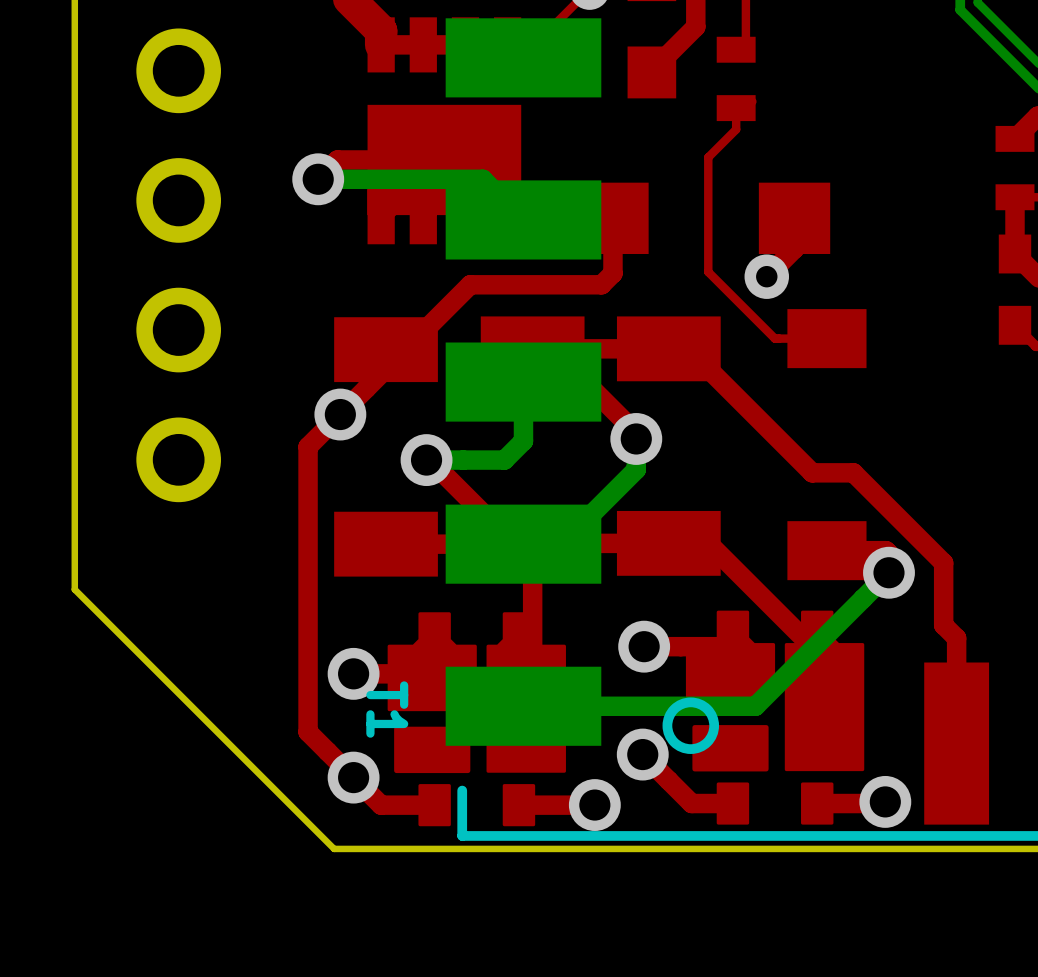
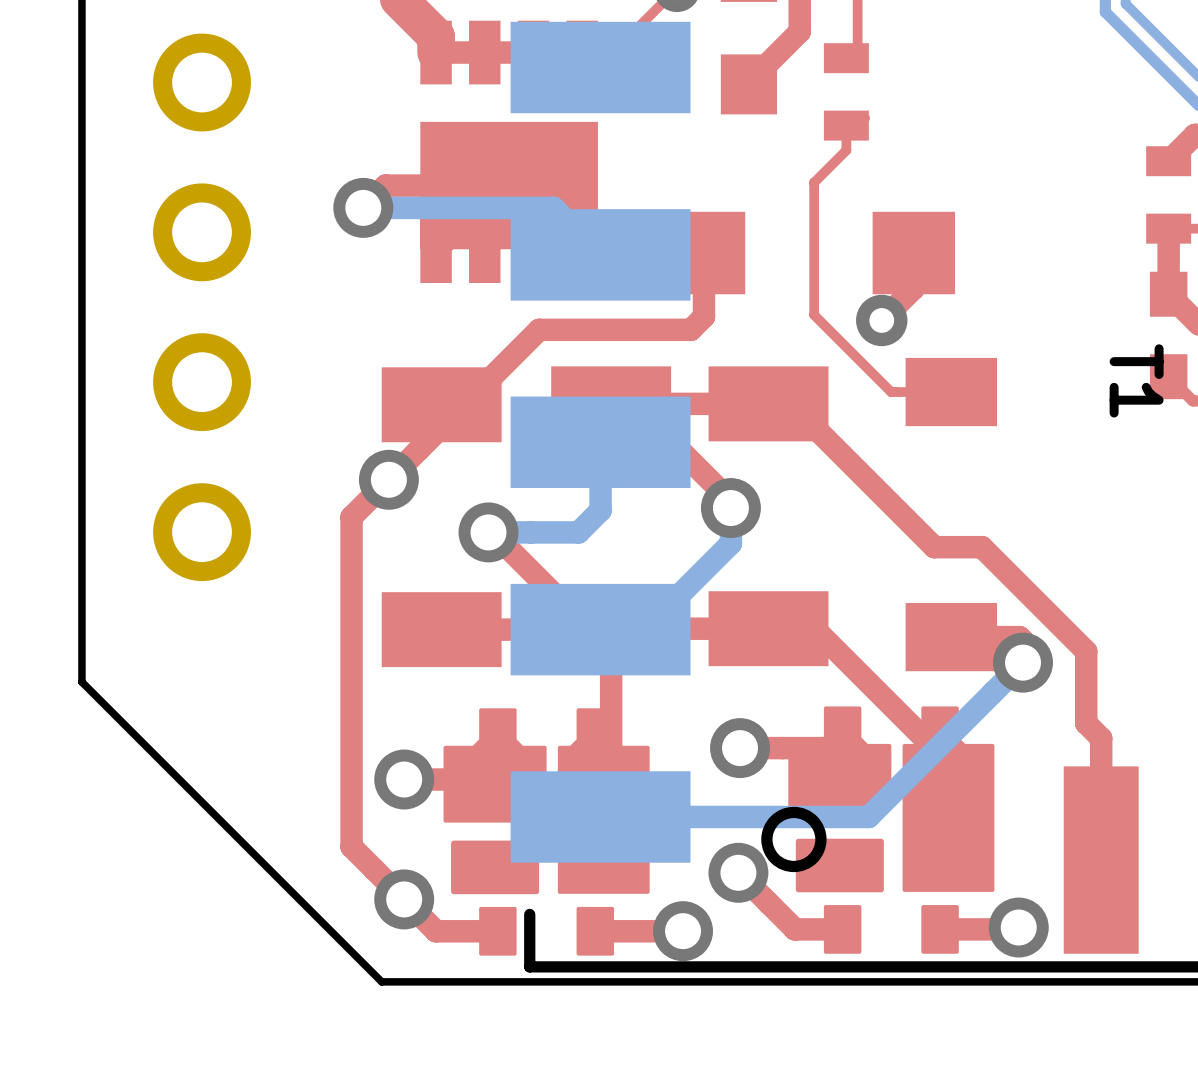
T1 name position: T1 (387, 709) -> T1 (1136, 380)

